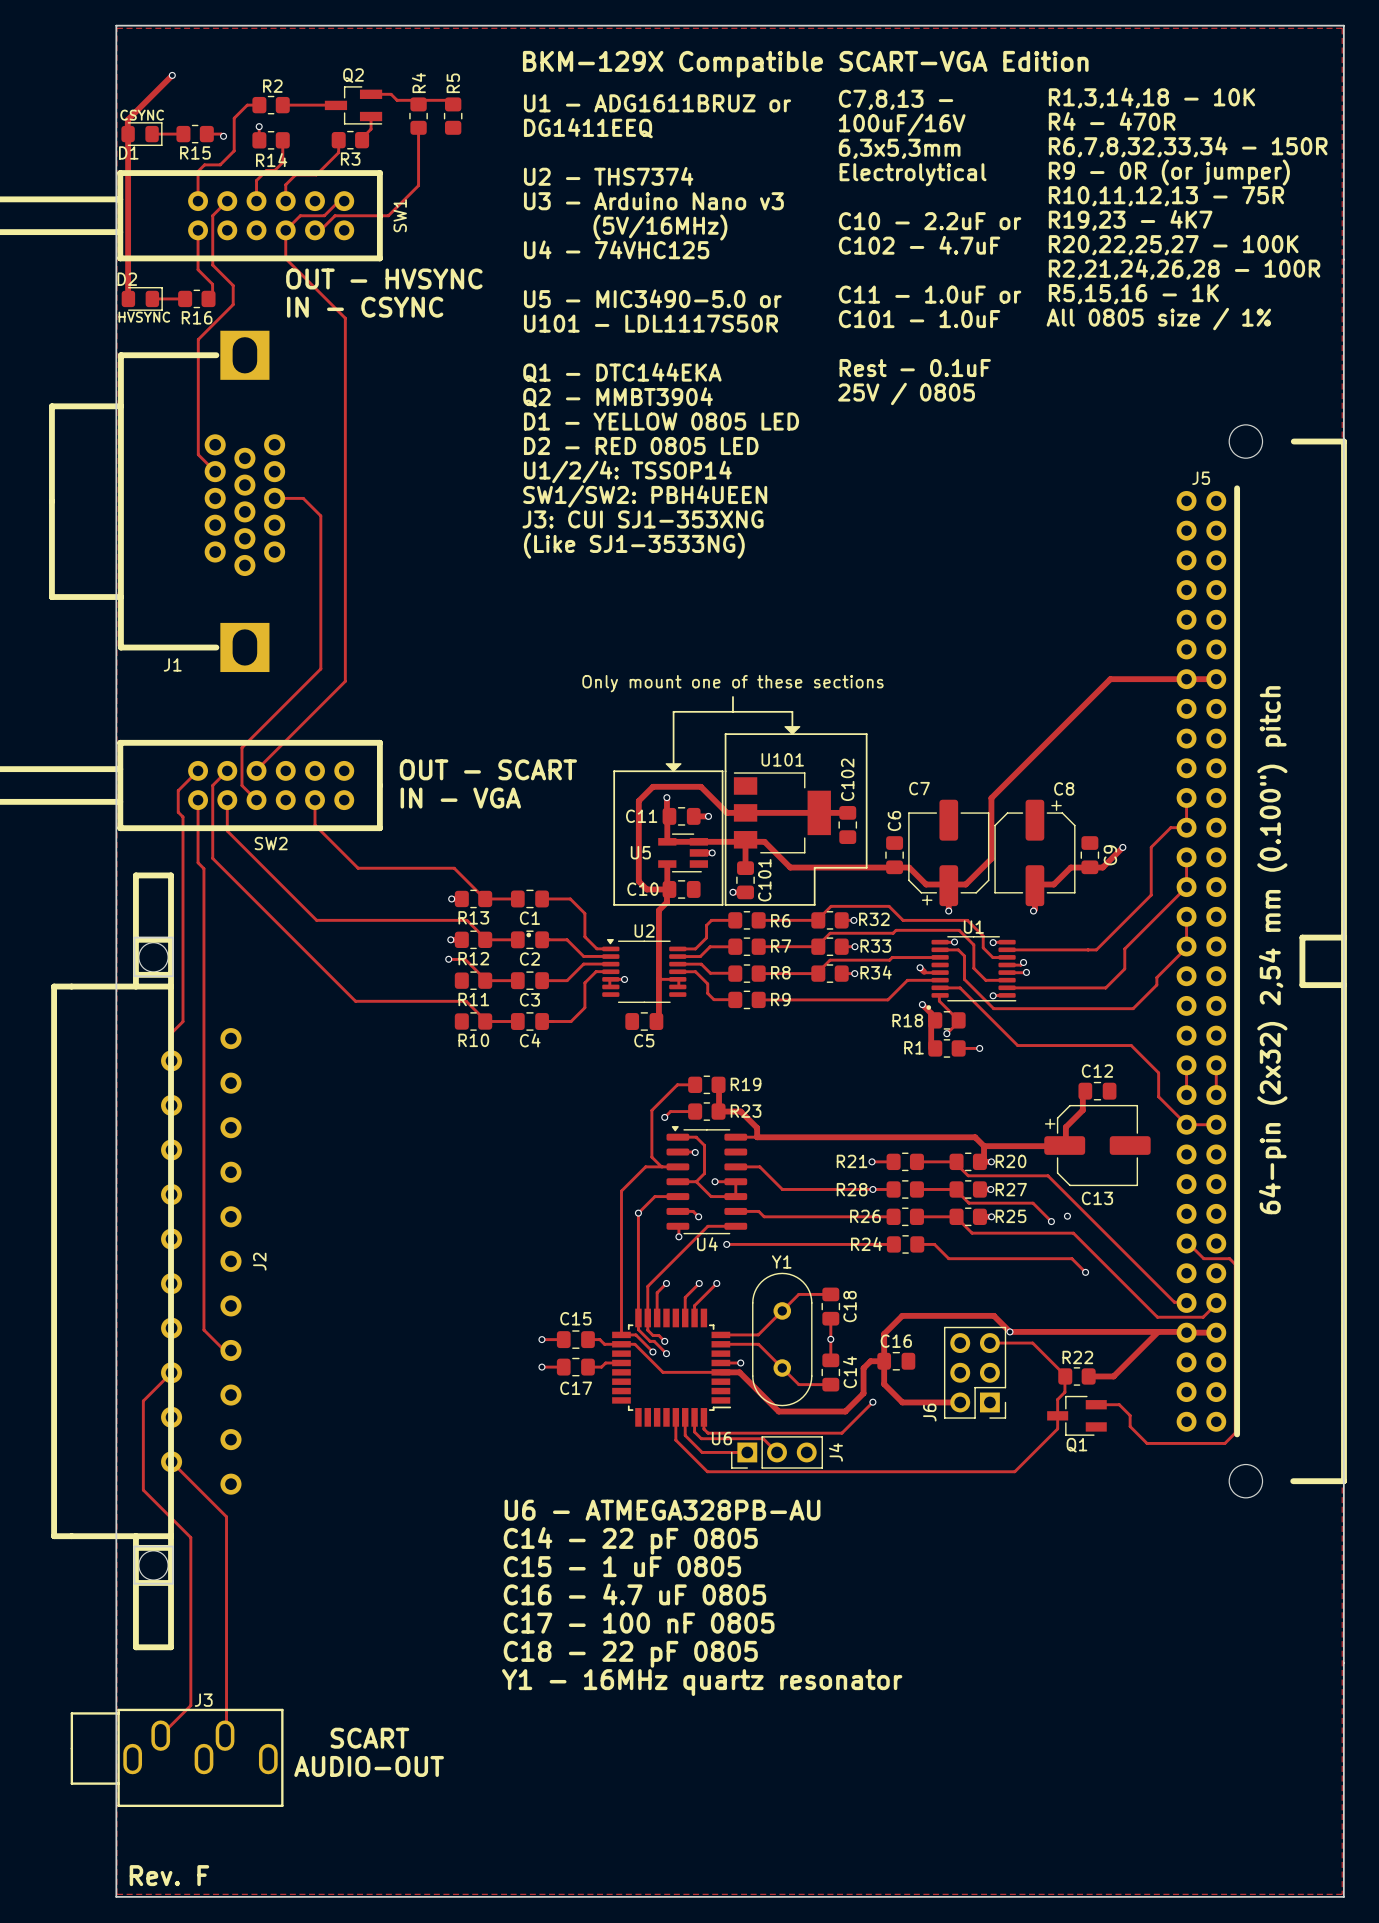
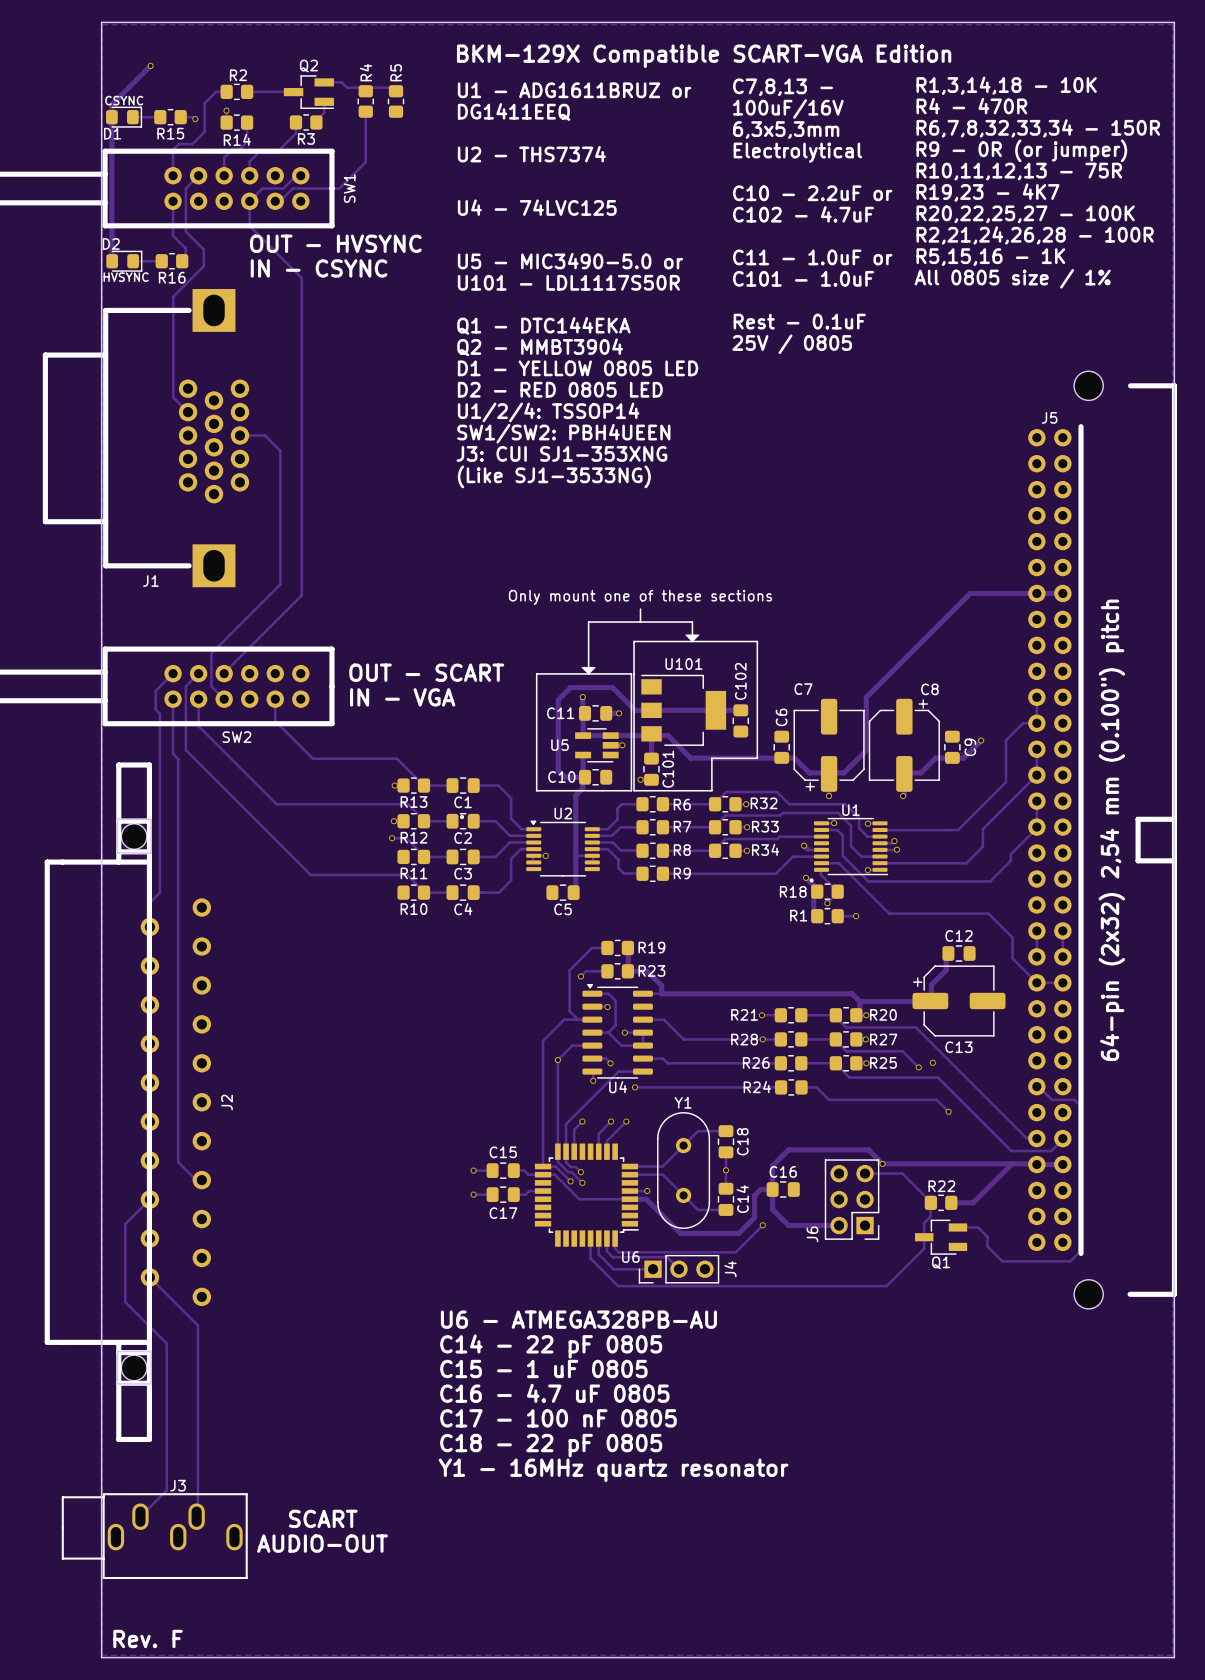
text: U3 - Arduino Nano v3 (653, 201) -> none
text: (5V/16MHz) (660, 227) -> none
text: U4 - 74VHC125 (616, 249) -> U4 - 74LVC125 (537, 207)

